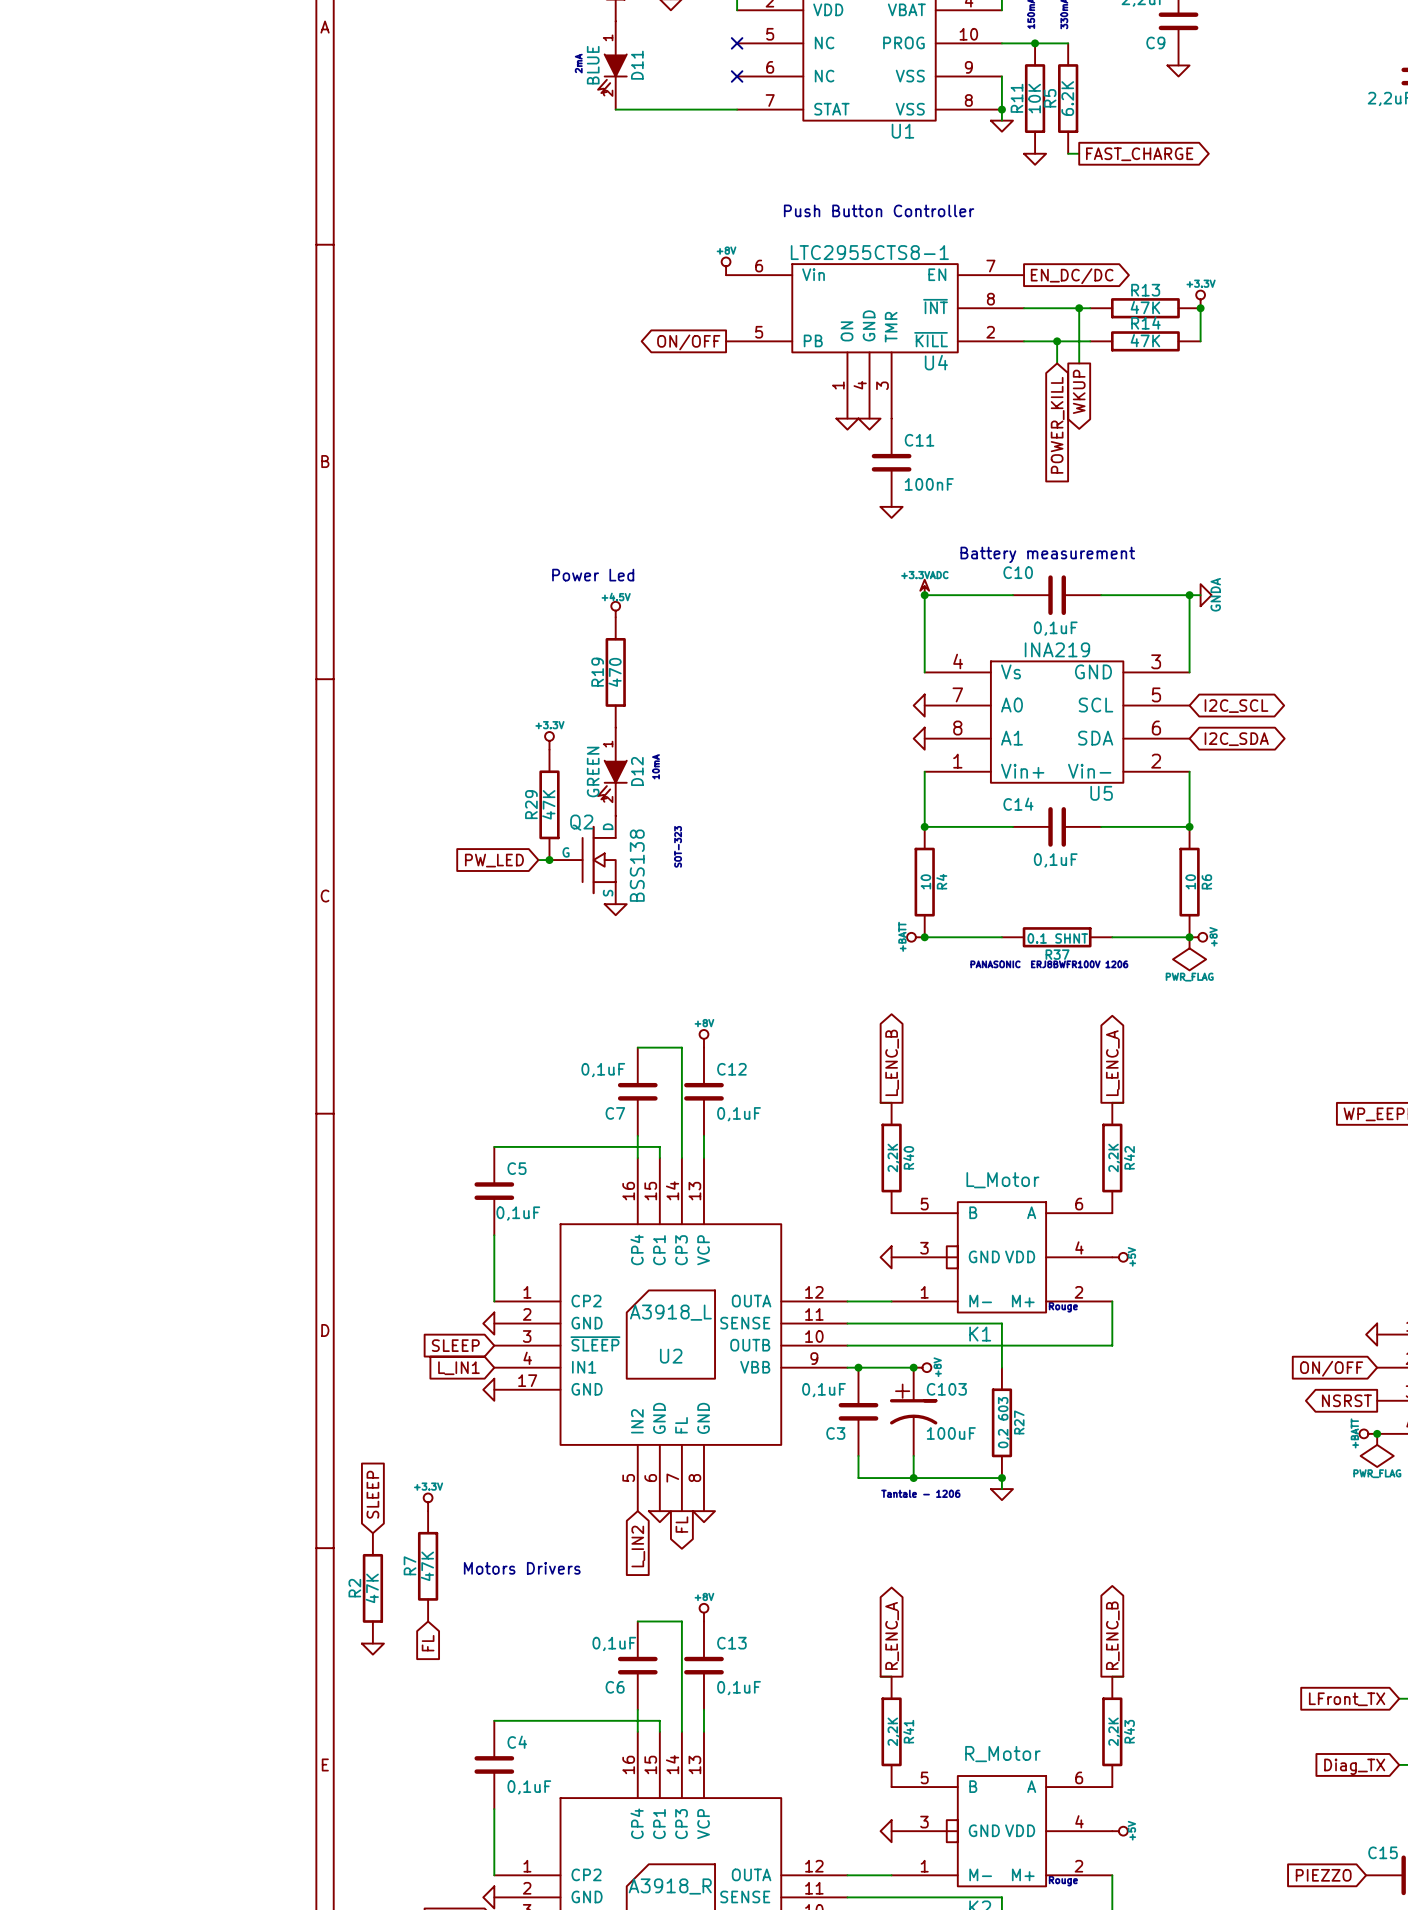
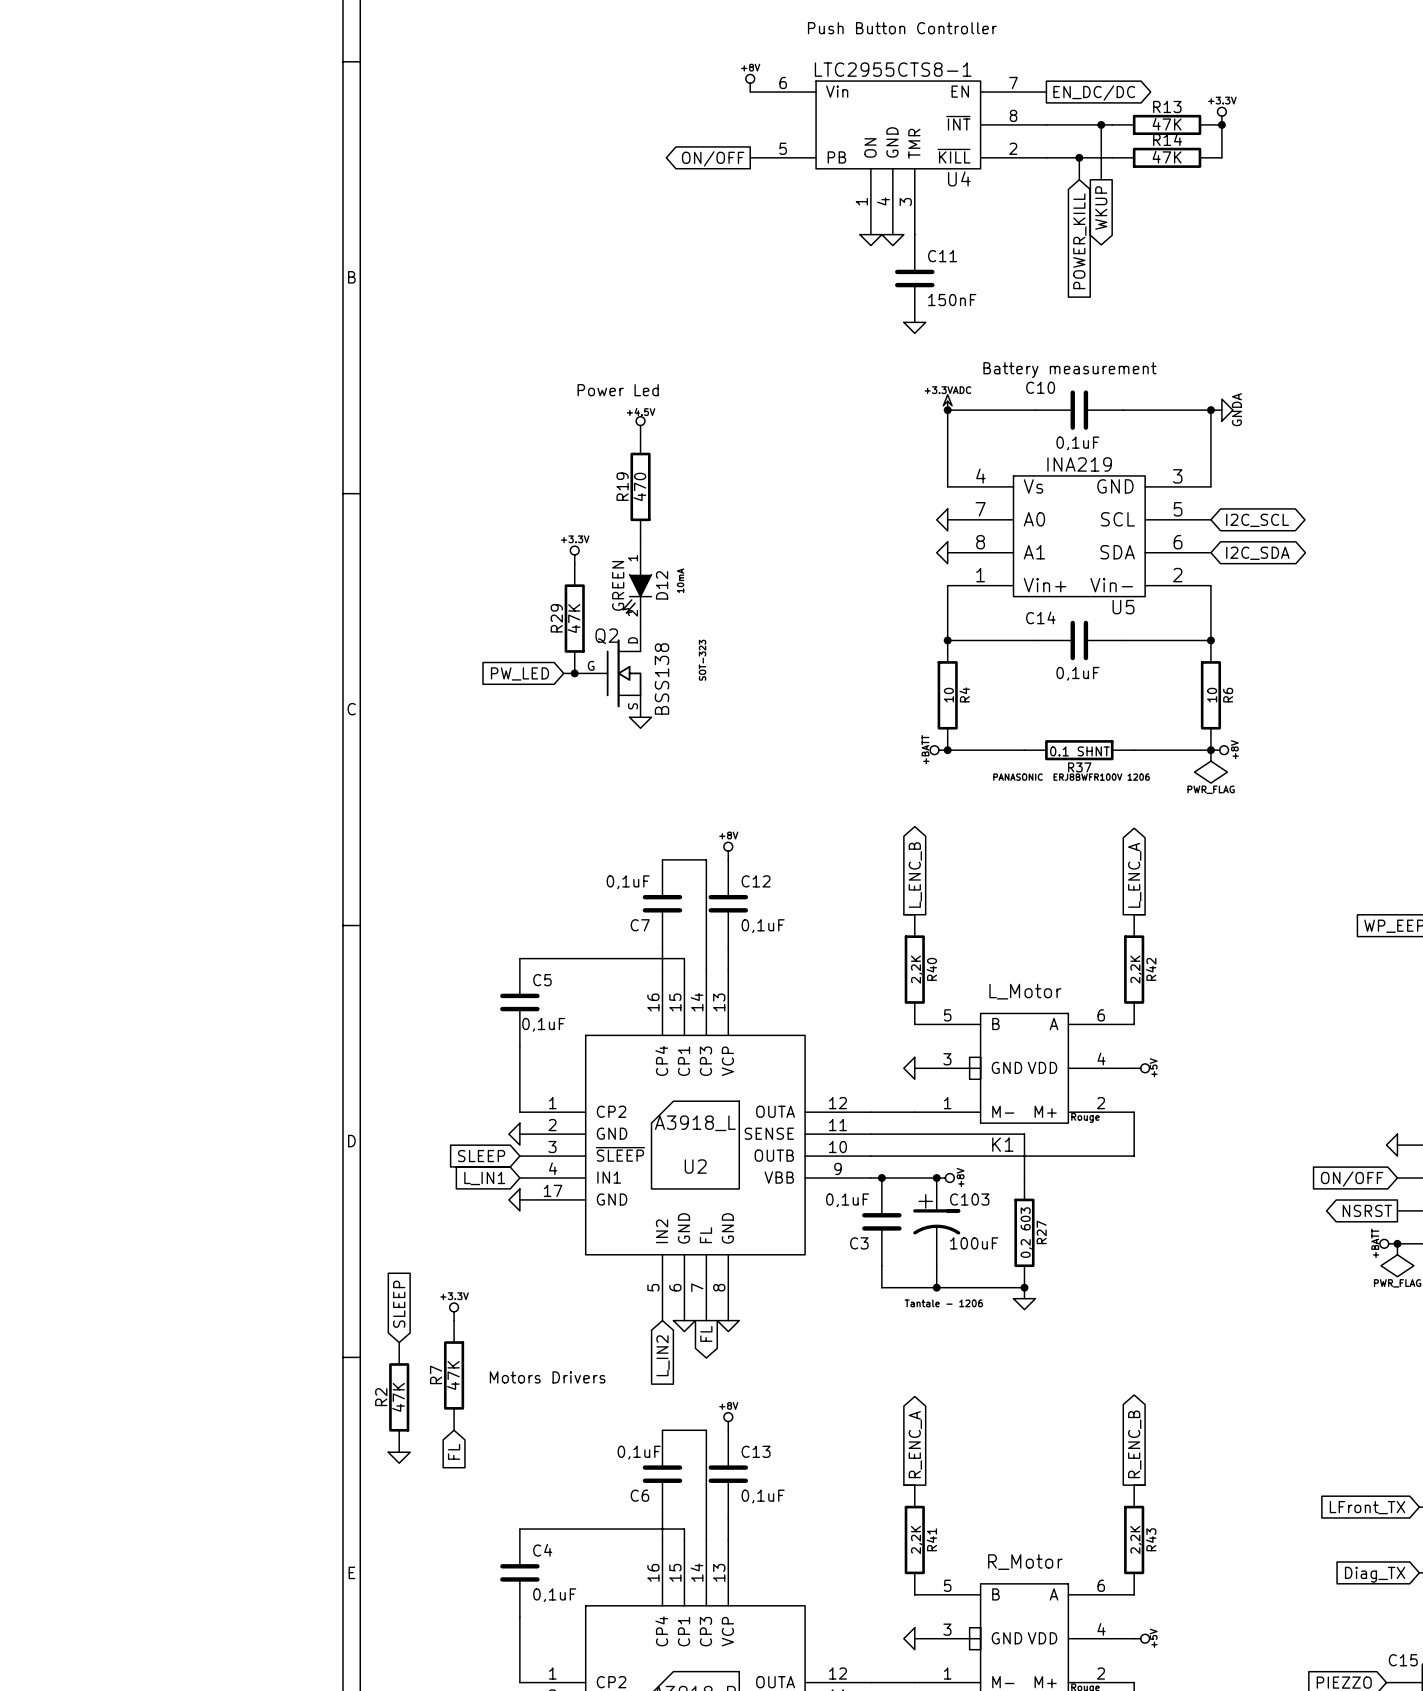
C11 value: 100nF (929, 484) -> 150nF (952, 300)

